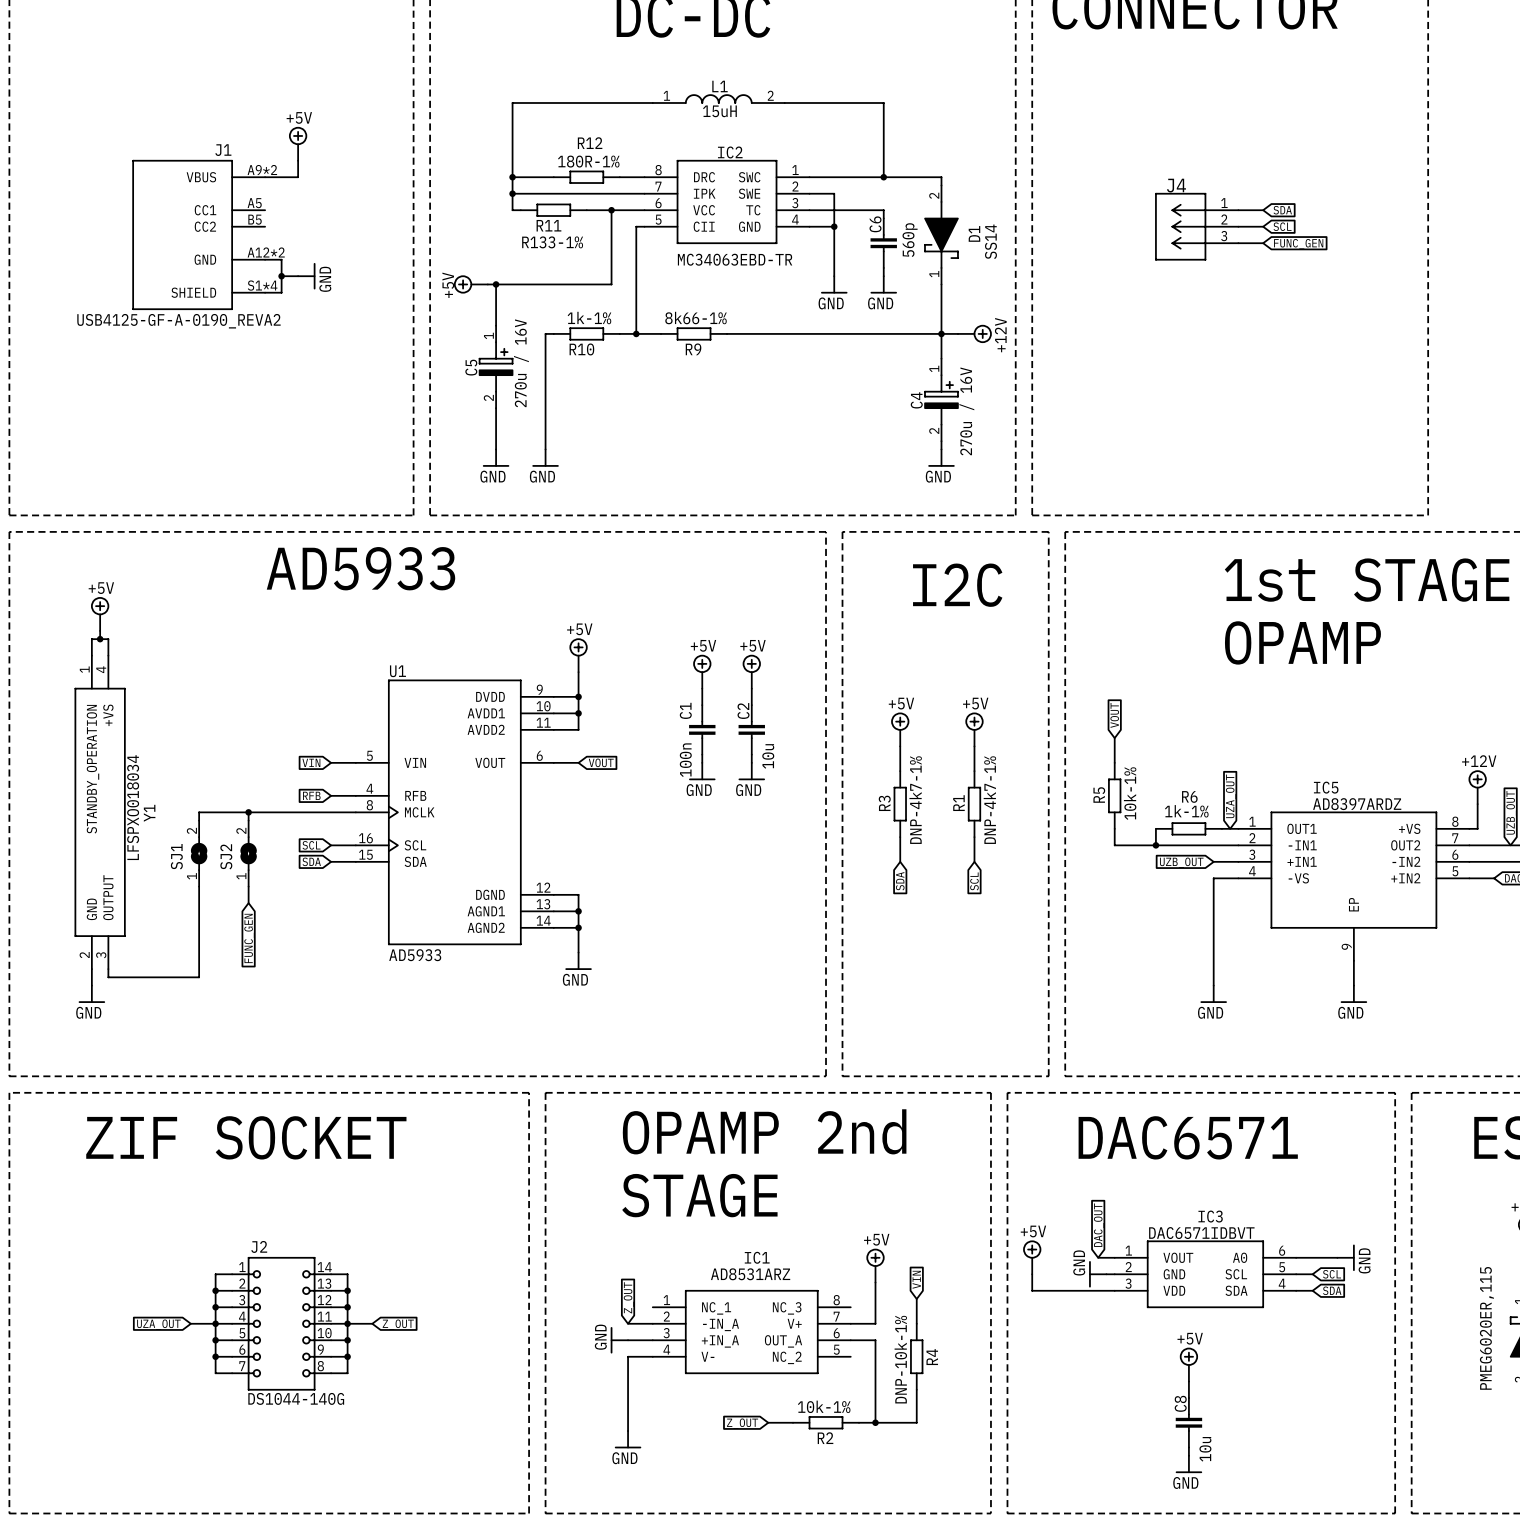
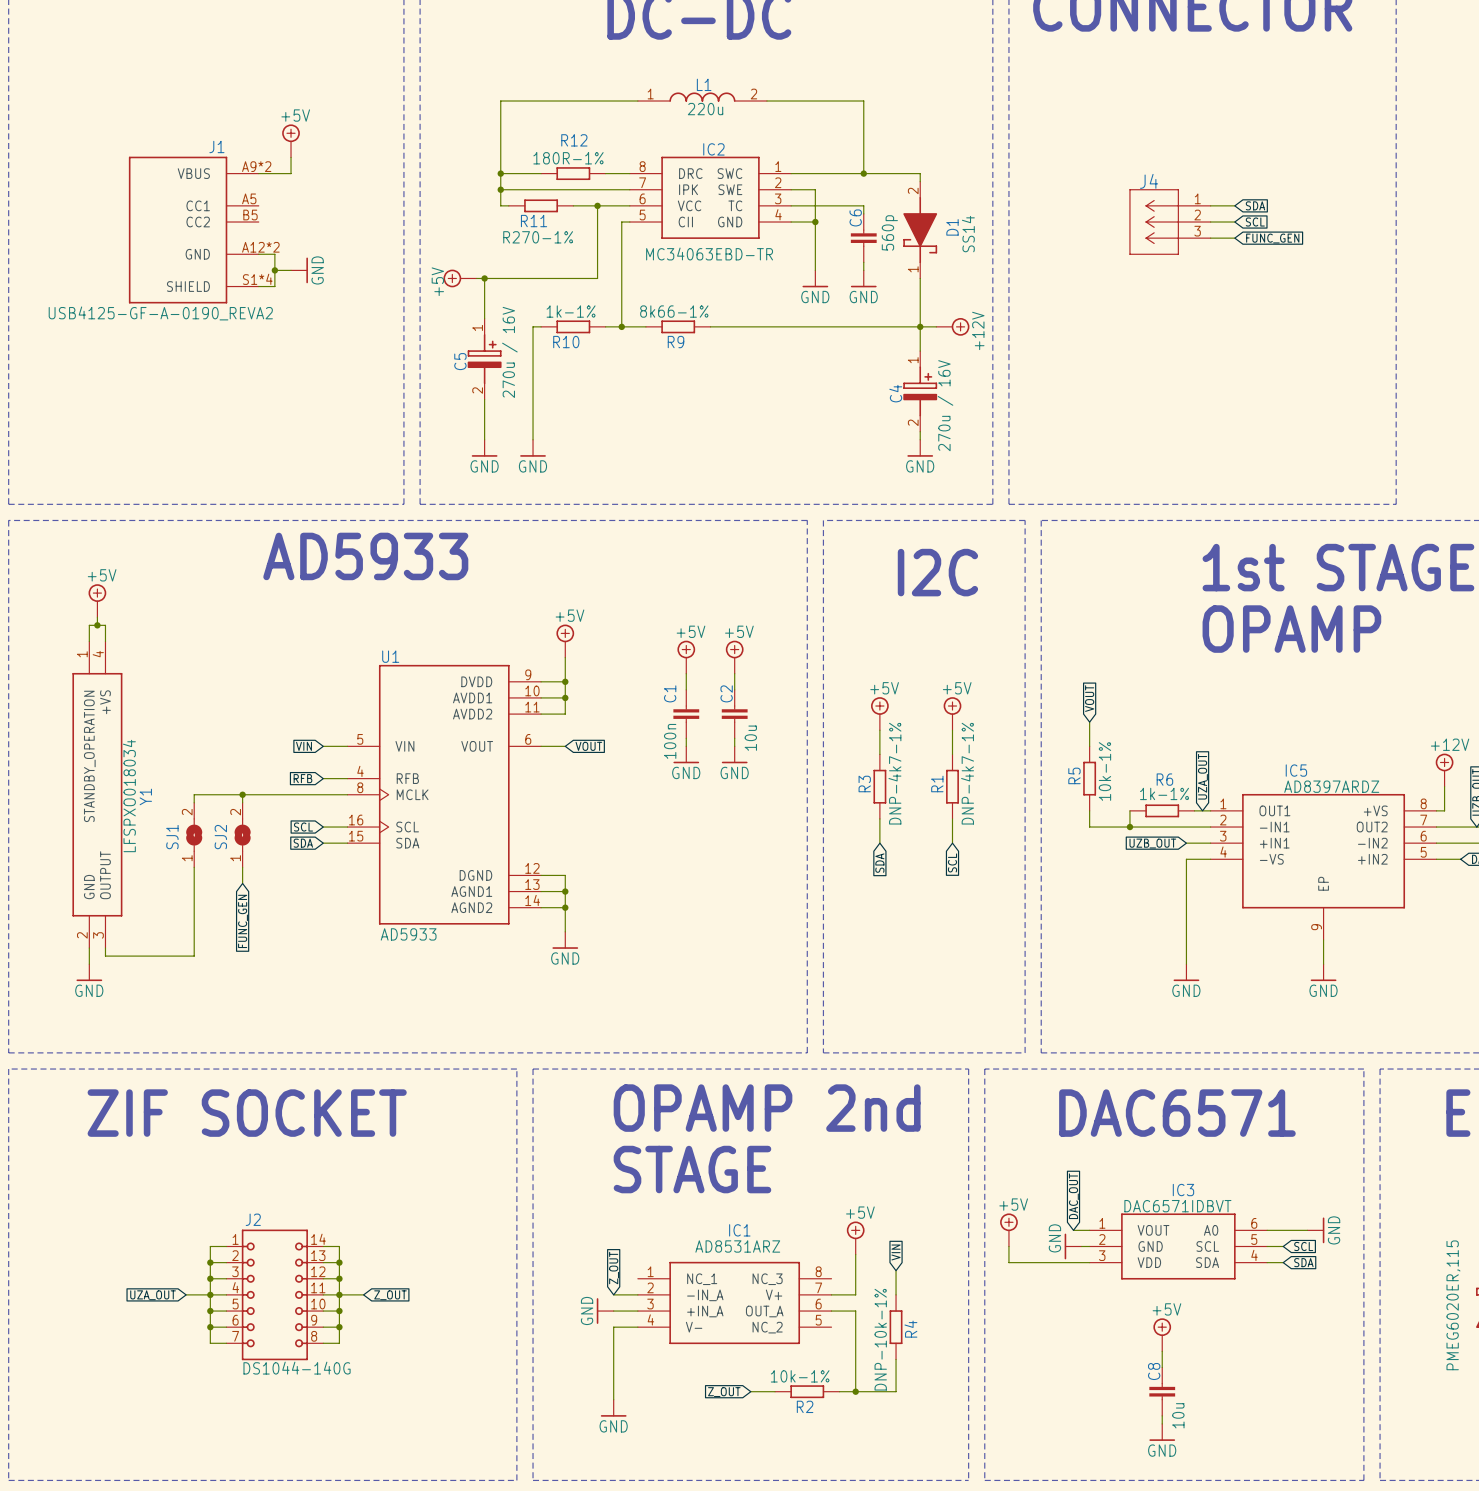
L1 value: 15uH (719, 111) -> 220u (705, 109)
R11 value: R133-1% (552, 242) -> R270-1% (538, 237)

